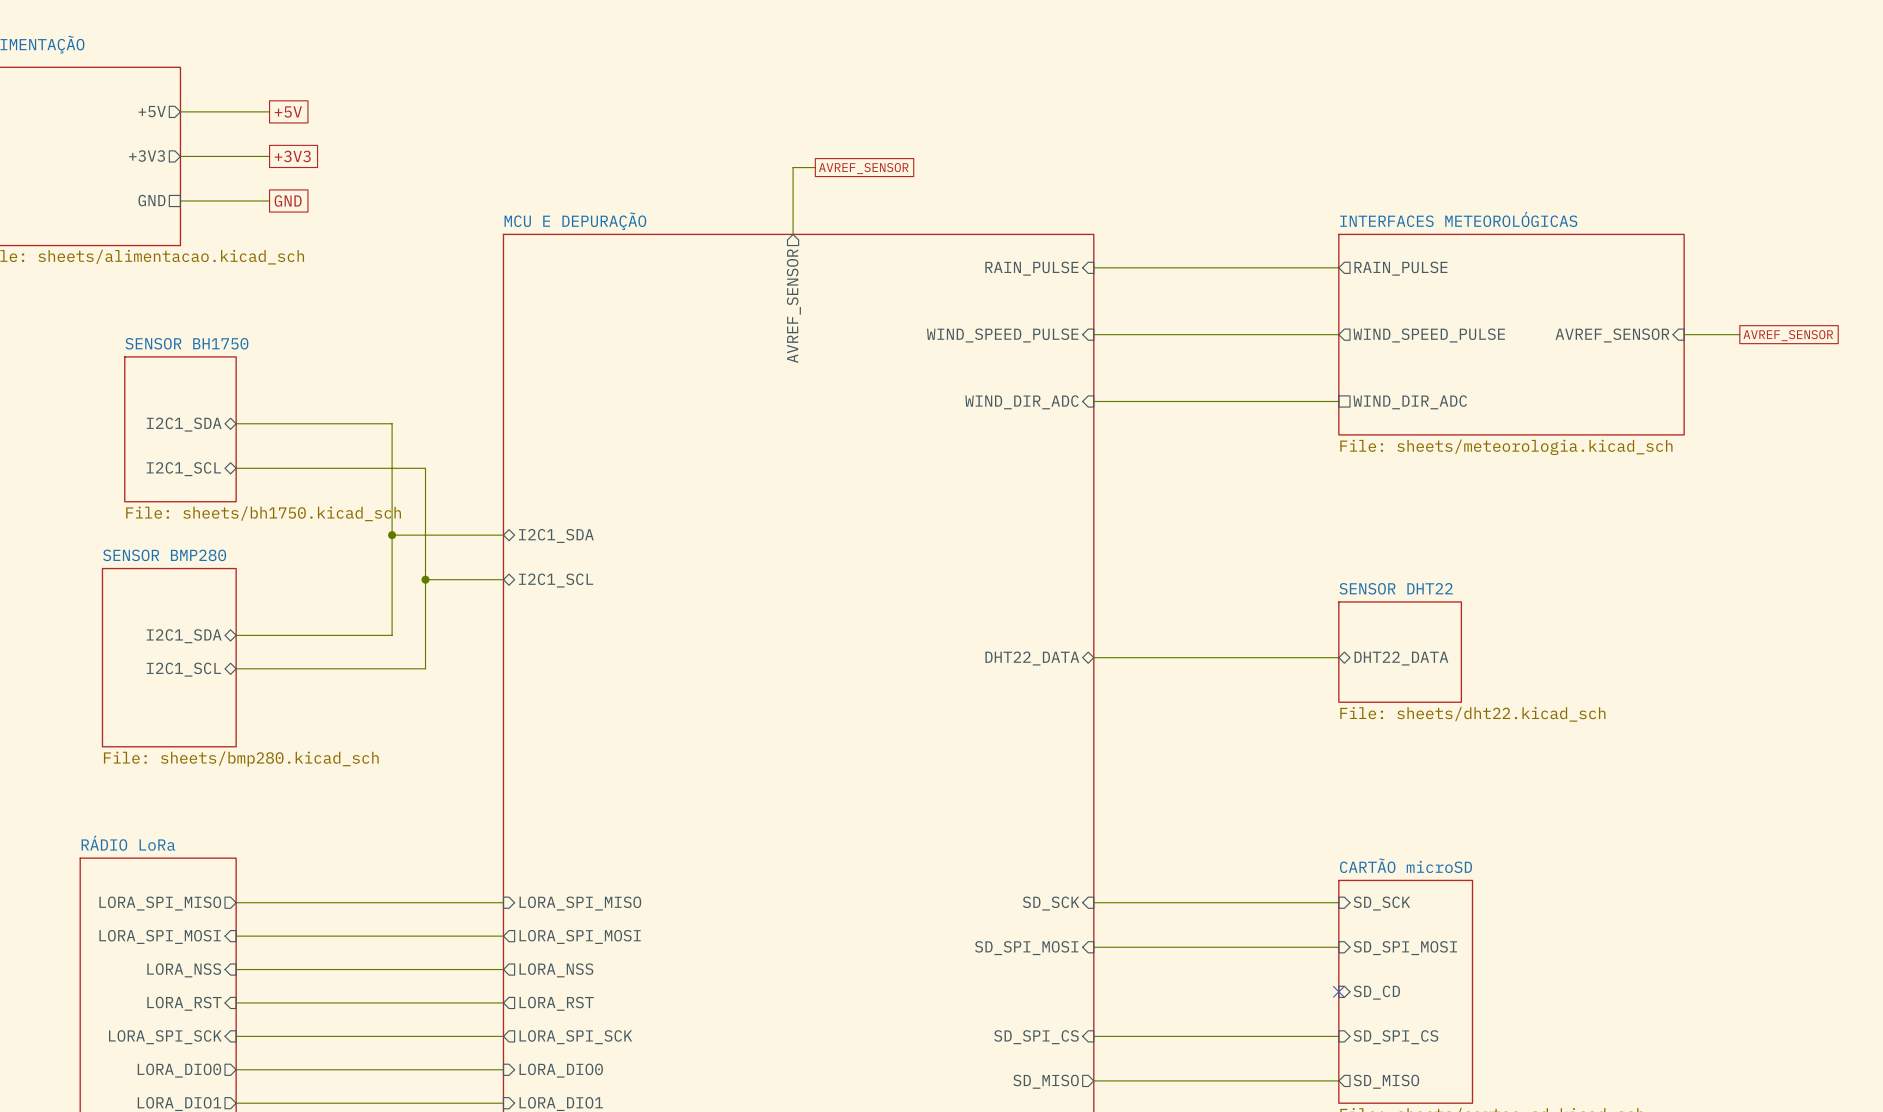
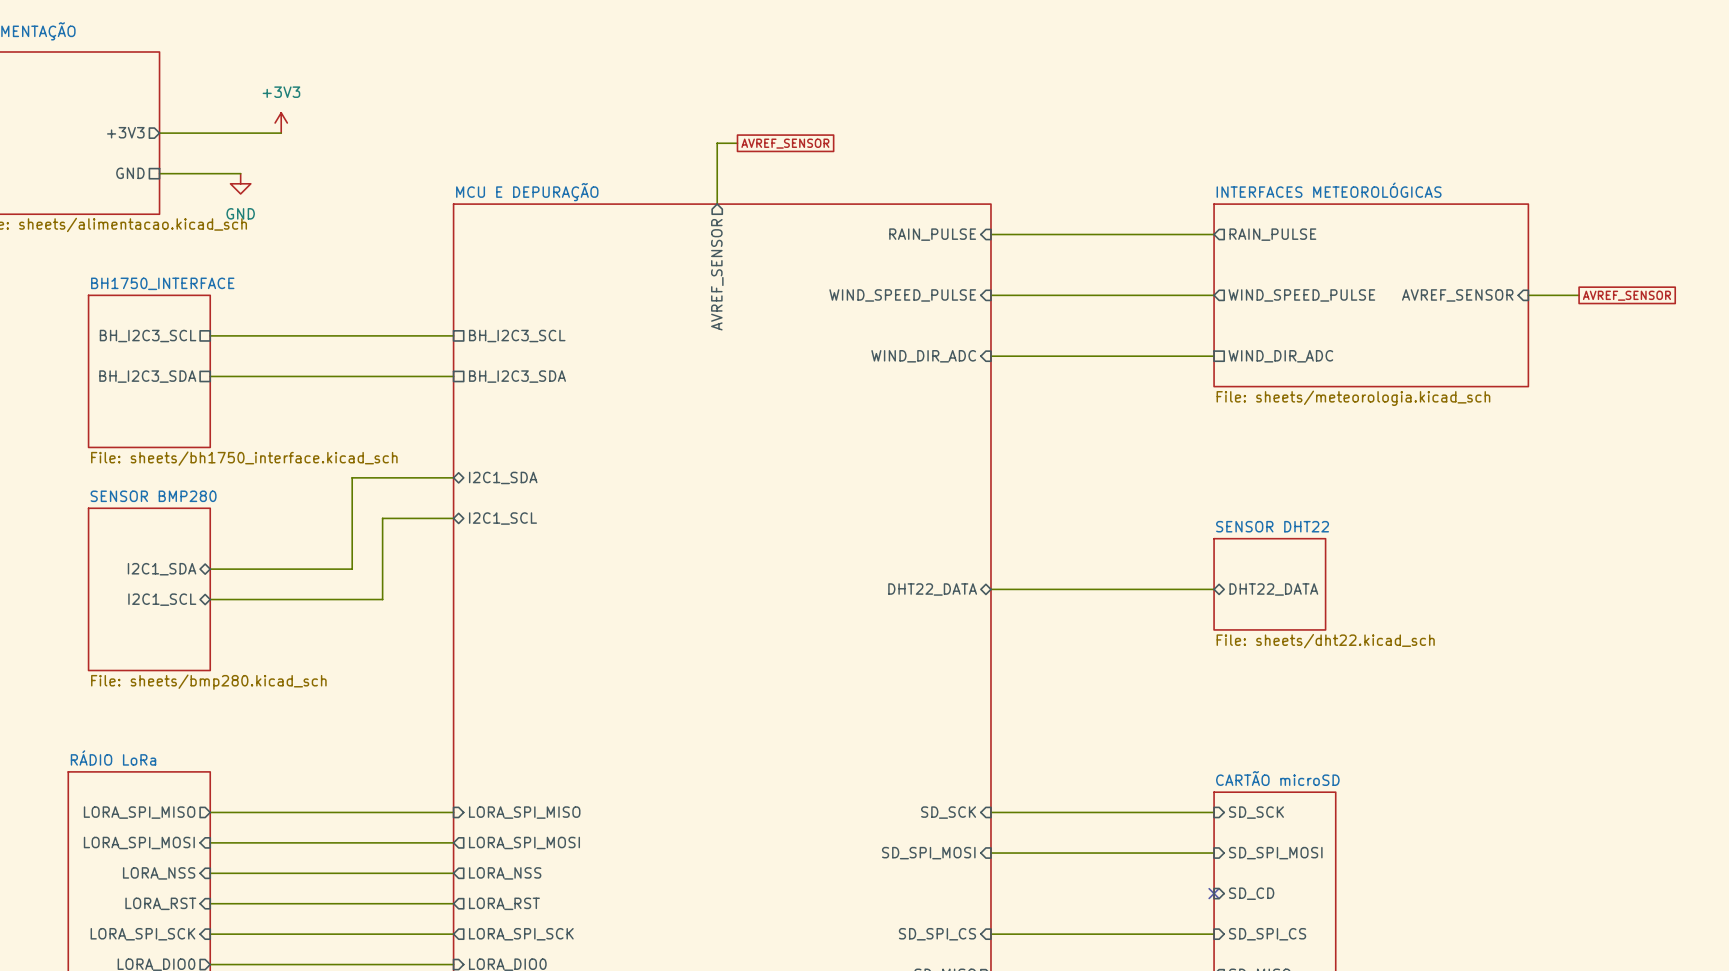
sheet pin: +5V (152, 111) -> none
wire: (180, 111) (269, 111) -> none
global label: +5V (288, 111) -> none
power symbol: none -> +3V3 (281, 122)
wire: none -> (240, 133) (281, 133)
global label: +3V3 (292, 156) -> none
global label: GND (288, 200) -> none
power symbol: none -> GND (240, 183)
wire: none -> (210, 335) (453, 335)
sheet pin: none -> BH_I2C3_SCL (148, 336)
sheet pin: none -> BH_I2C3_SCL (517, 336)
sheet BH1750_INTERFACE: none -> File: sheets/bh1750_interface.kicad_sch (149, 371)
wire: (392, 423) (392, 535) -> (352, 376) (453, 376)
sheet pin shape: bidirectional (184, 424) -> passive (147, 376)
sheet pin: I2C1_SDA (184, 424) -> BH_I2C3_SDA (147, 376)
sheet pin: none -> BH_I2C3_SDA (517, 376)
sheet SENSOR BH1750: File: sheets/bh1750.kicad_sch (180, 429) -> none
wire: (236, 468) (425, 468) (425, 579) -> none
sheet pin: I2C1_SCL (183, 469) -> none
junction: (392, 535) -> none
junction: (425, 579) -> none

